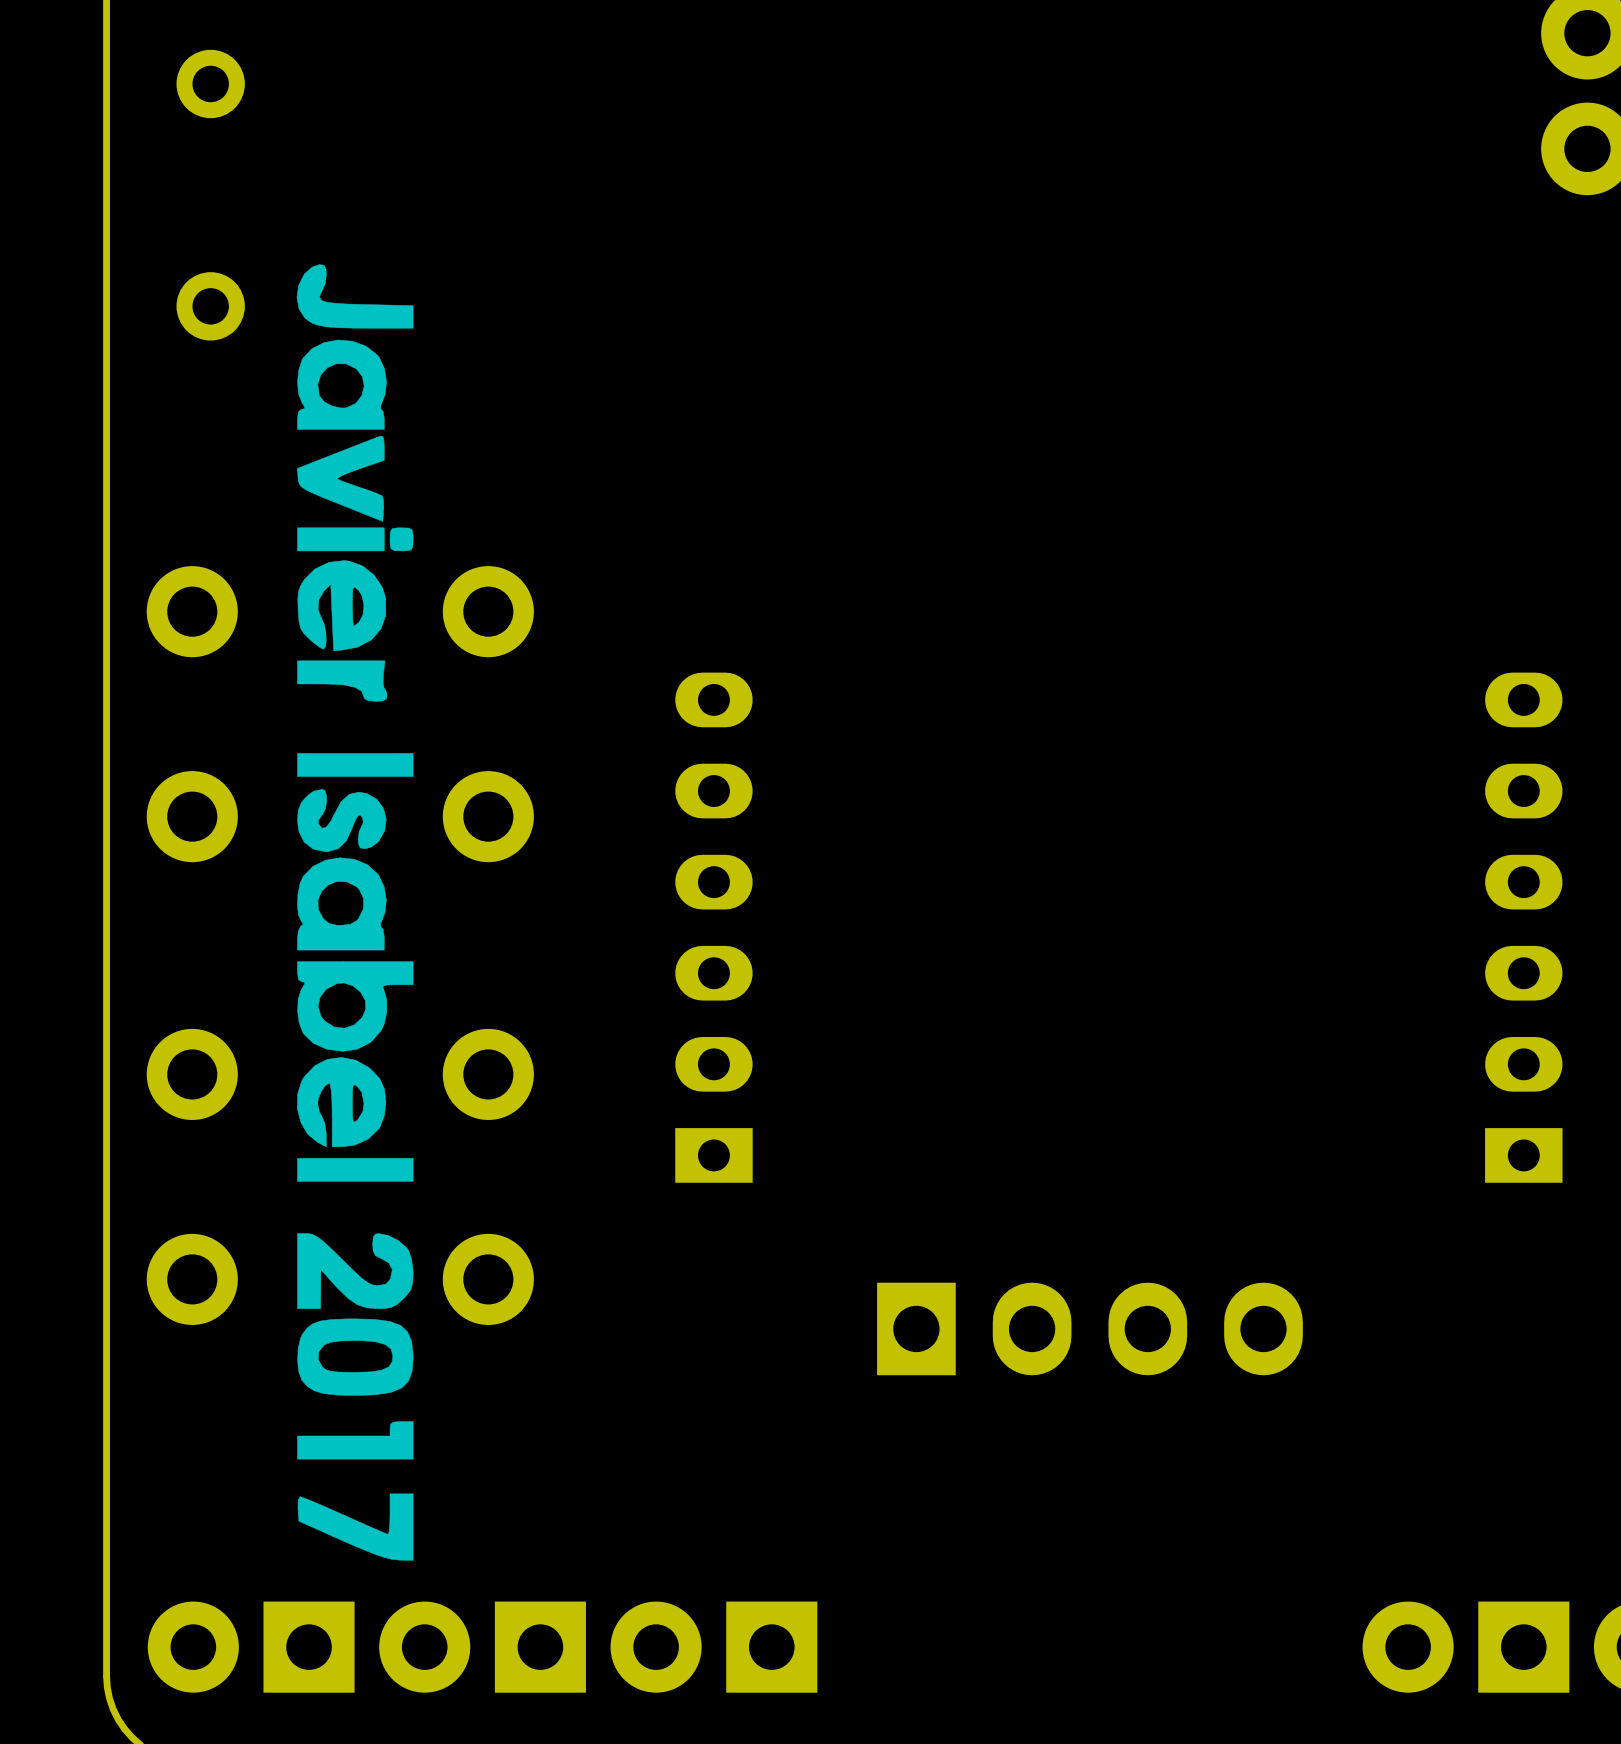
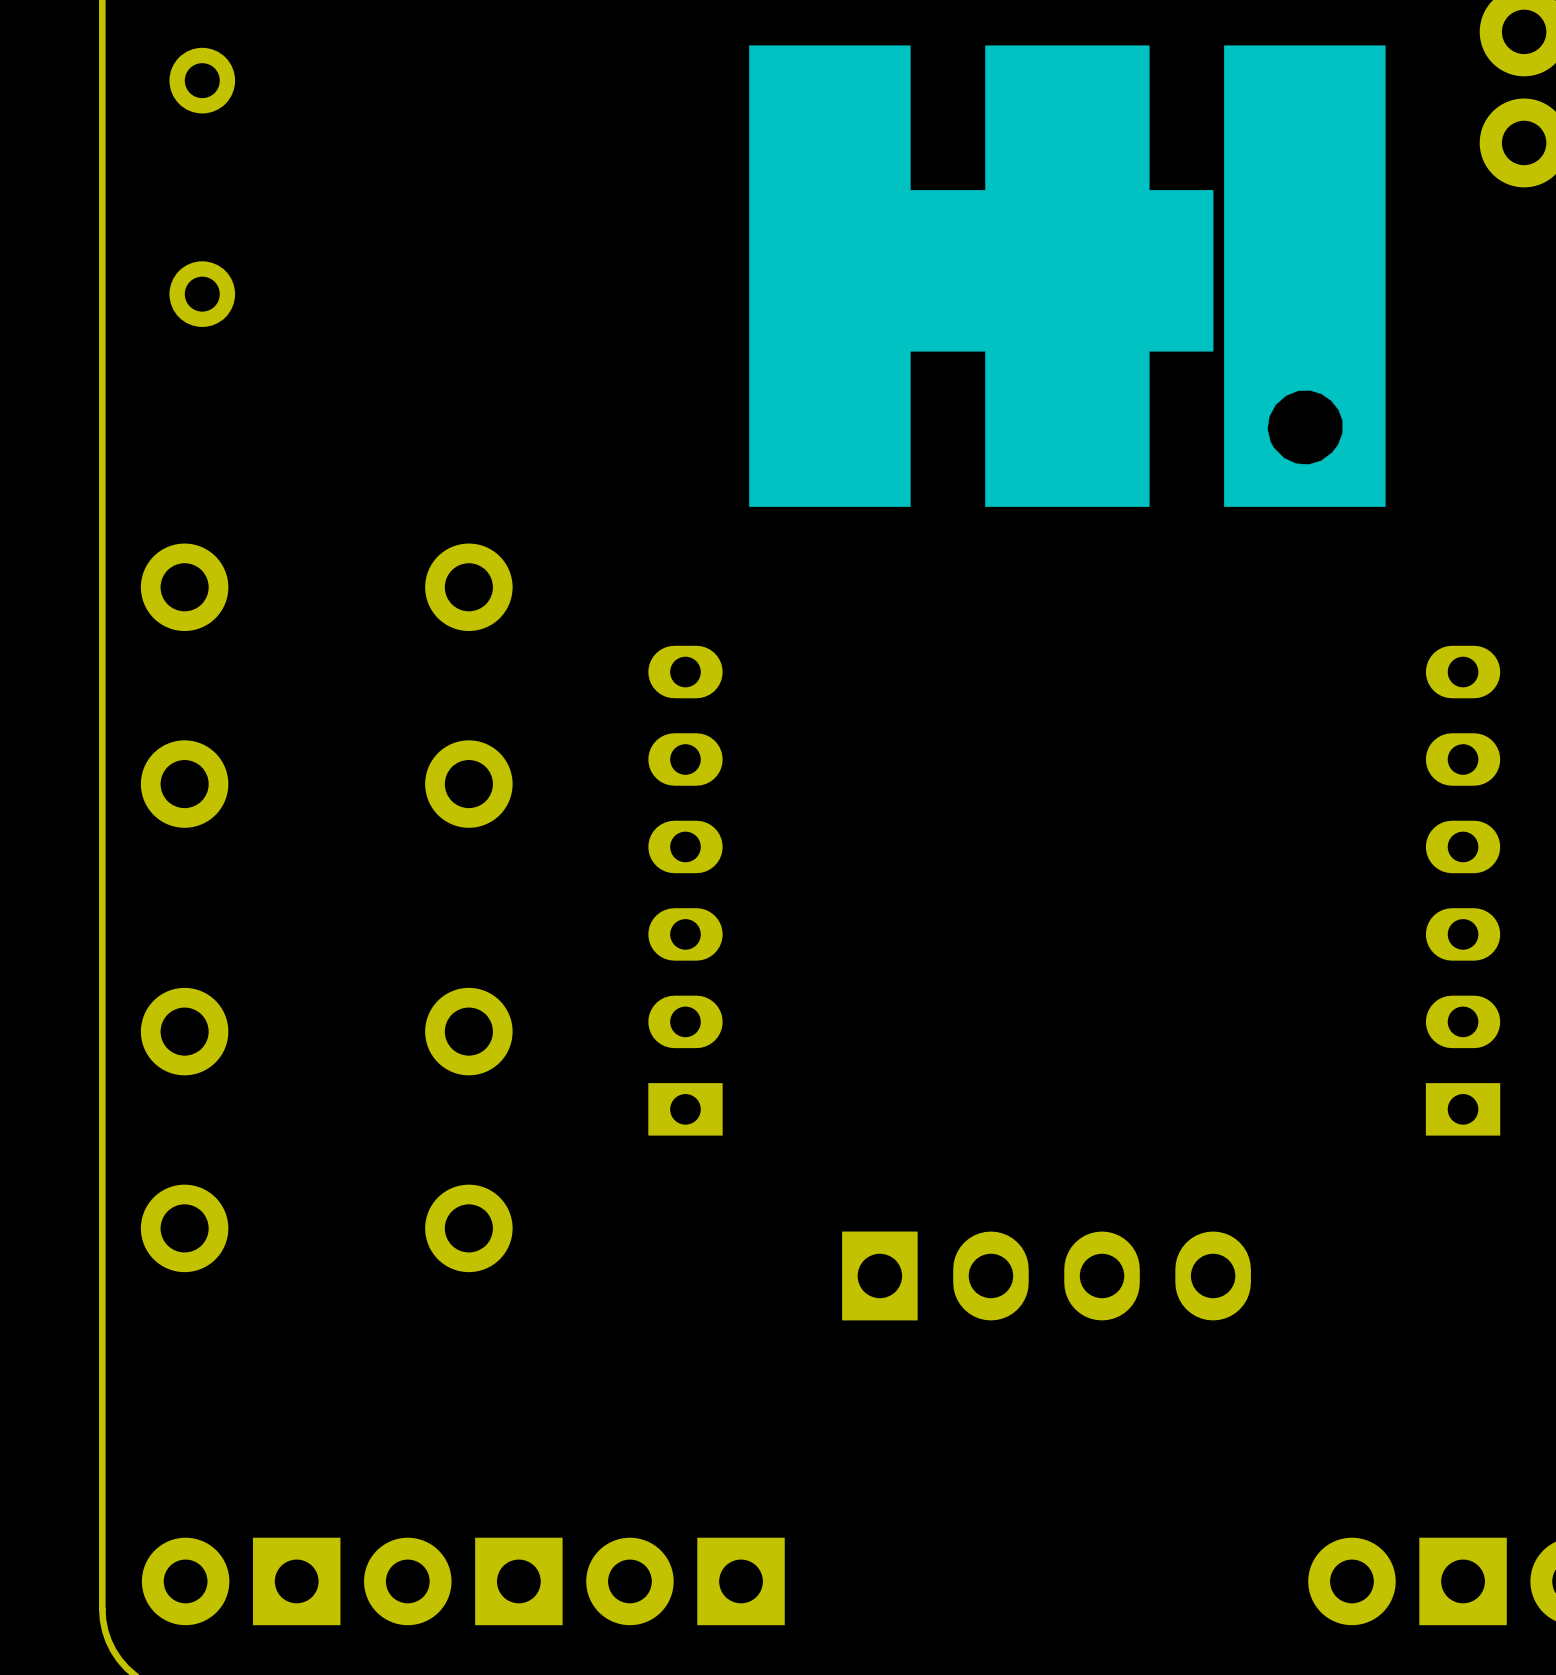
drawing: none -> [749, 45, 1386, 507]
drawing: [296, 264, 414, 1561] -> none

